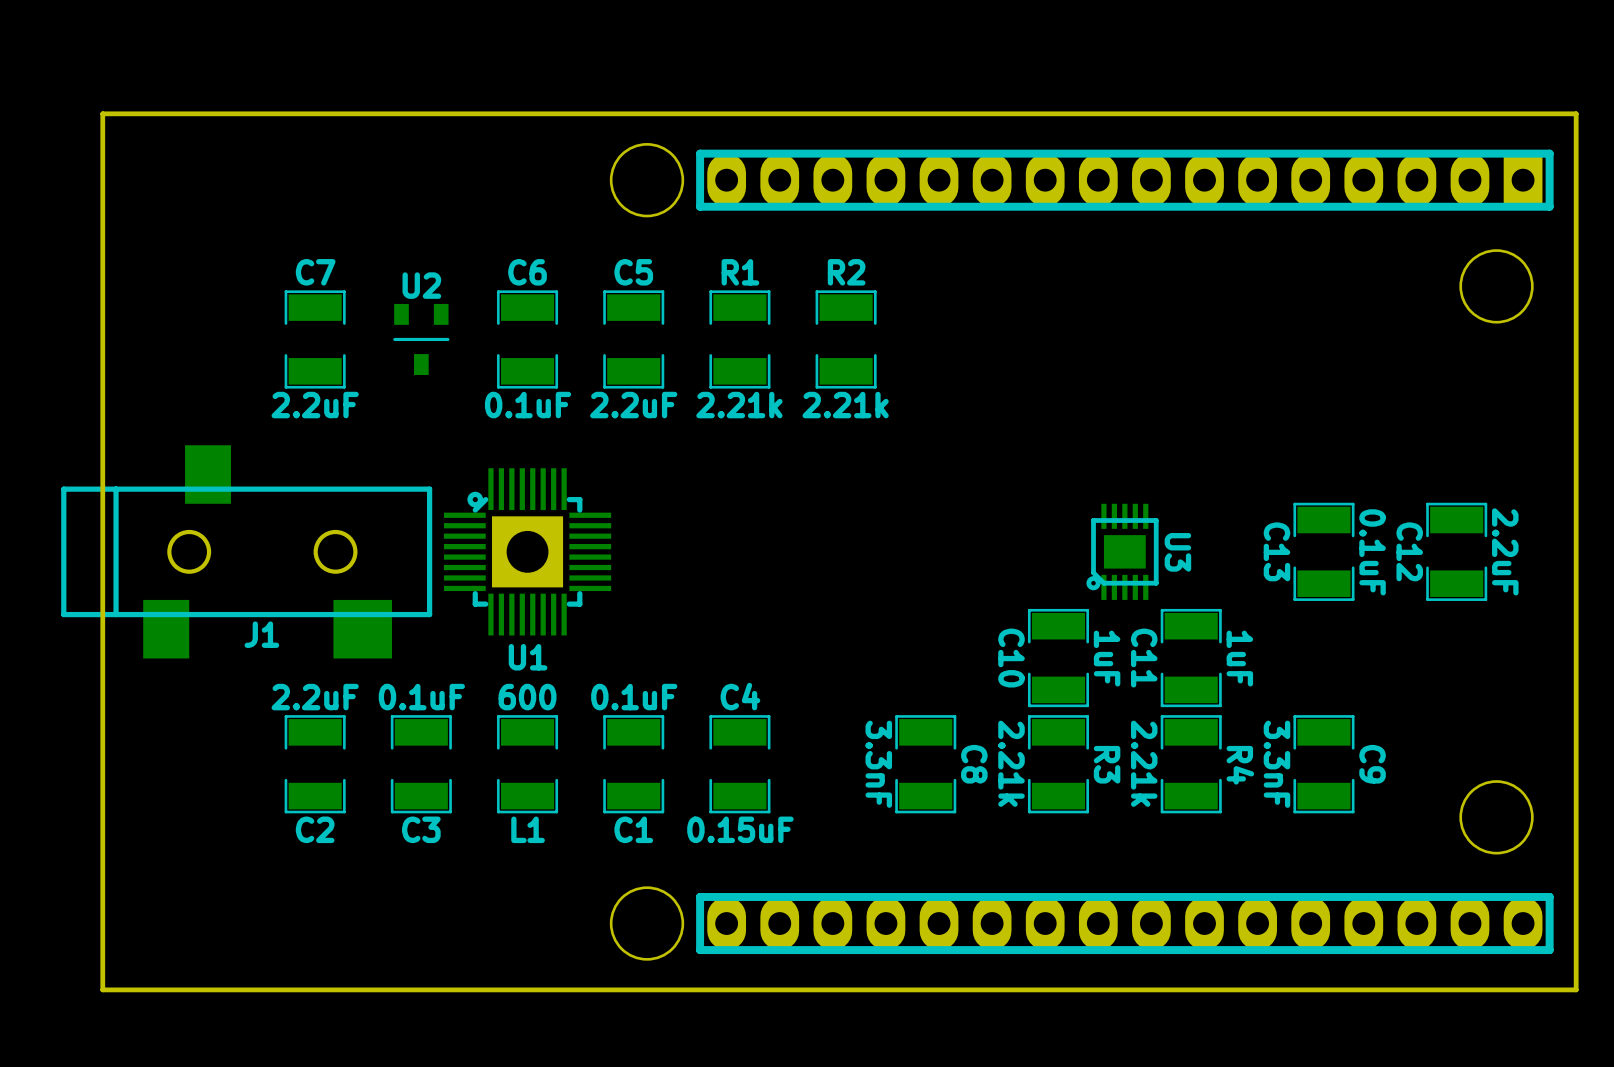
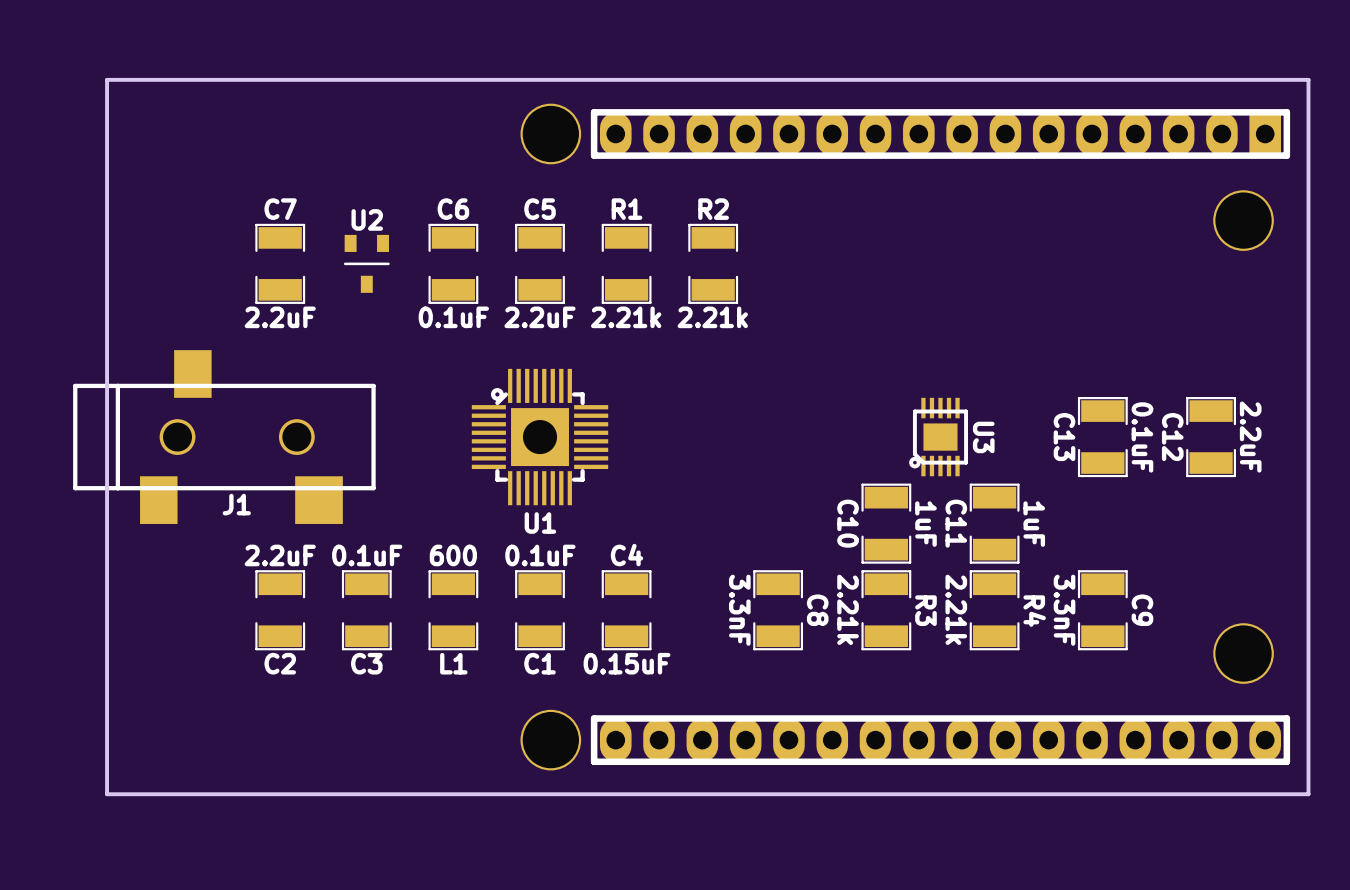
U1 position: (527, 551) -> (540, 437)

